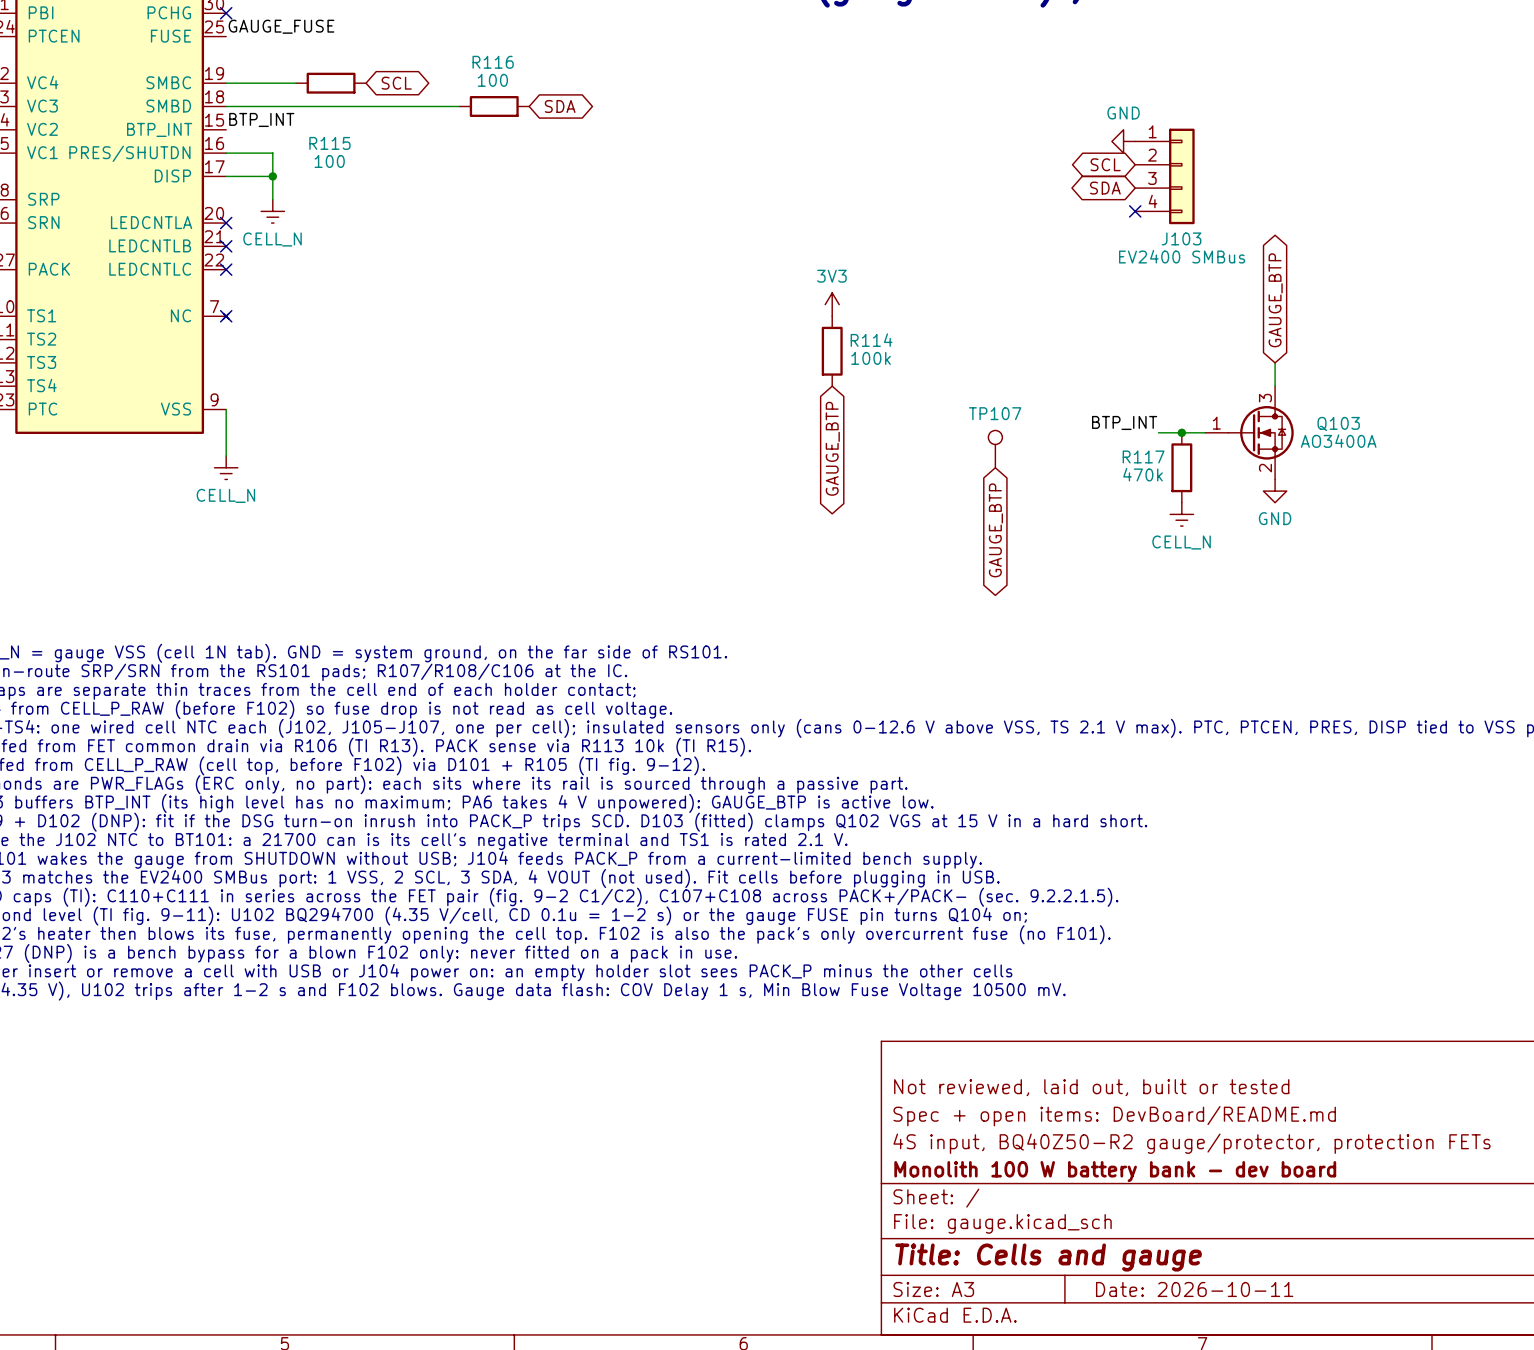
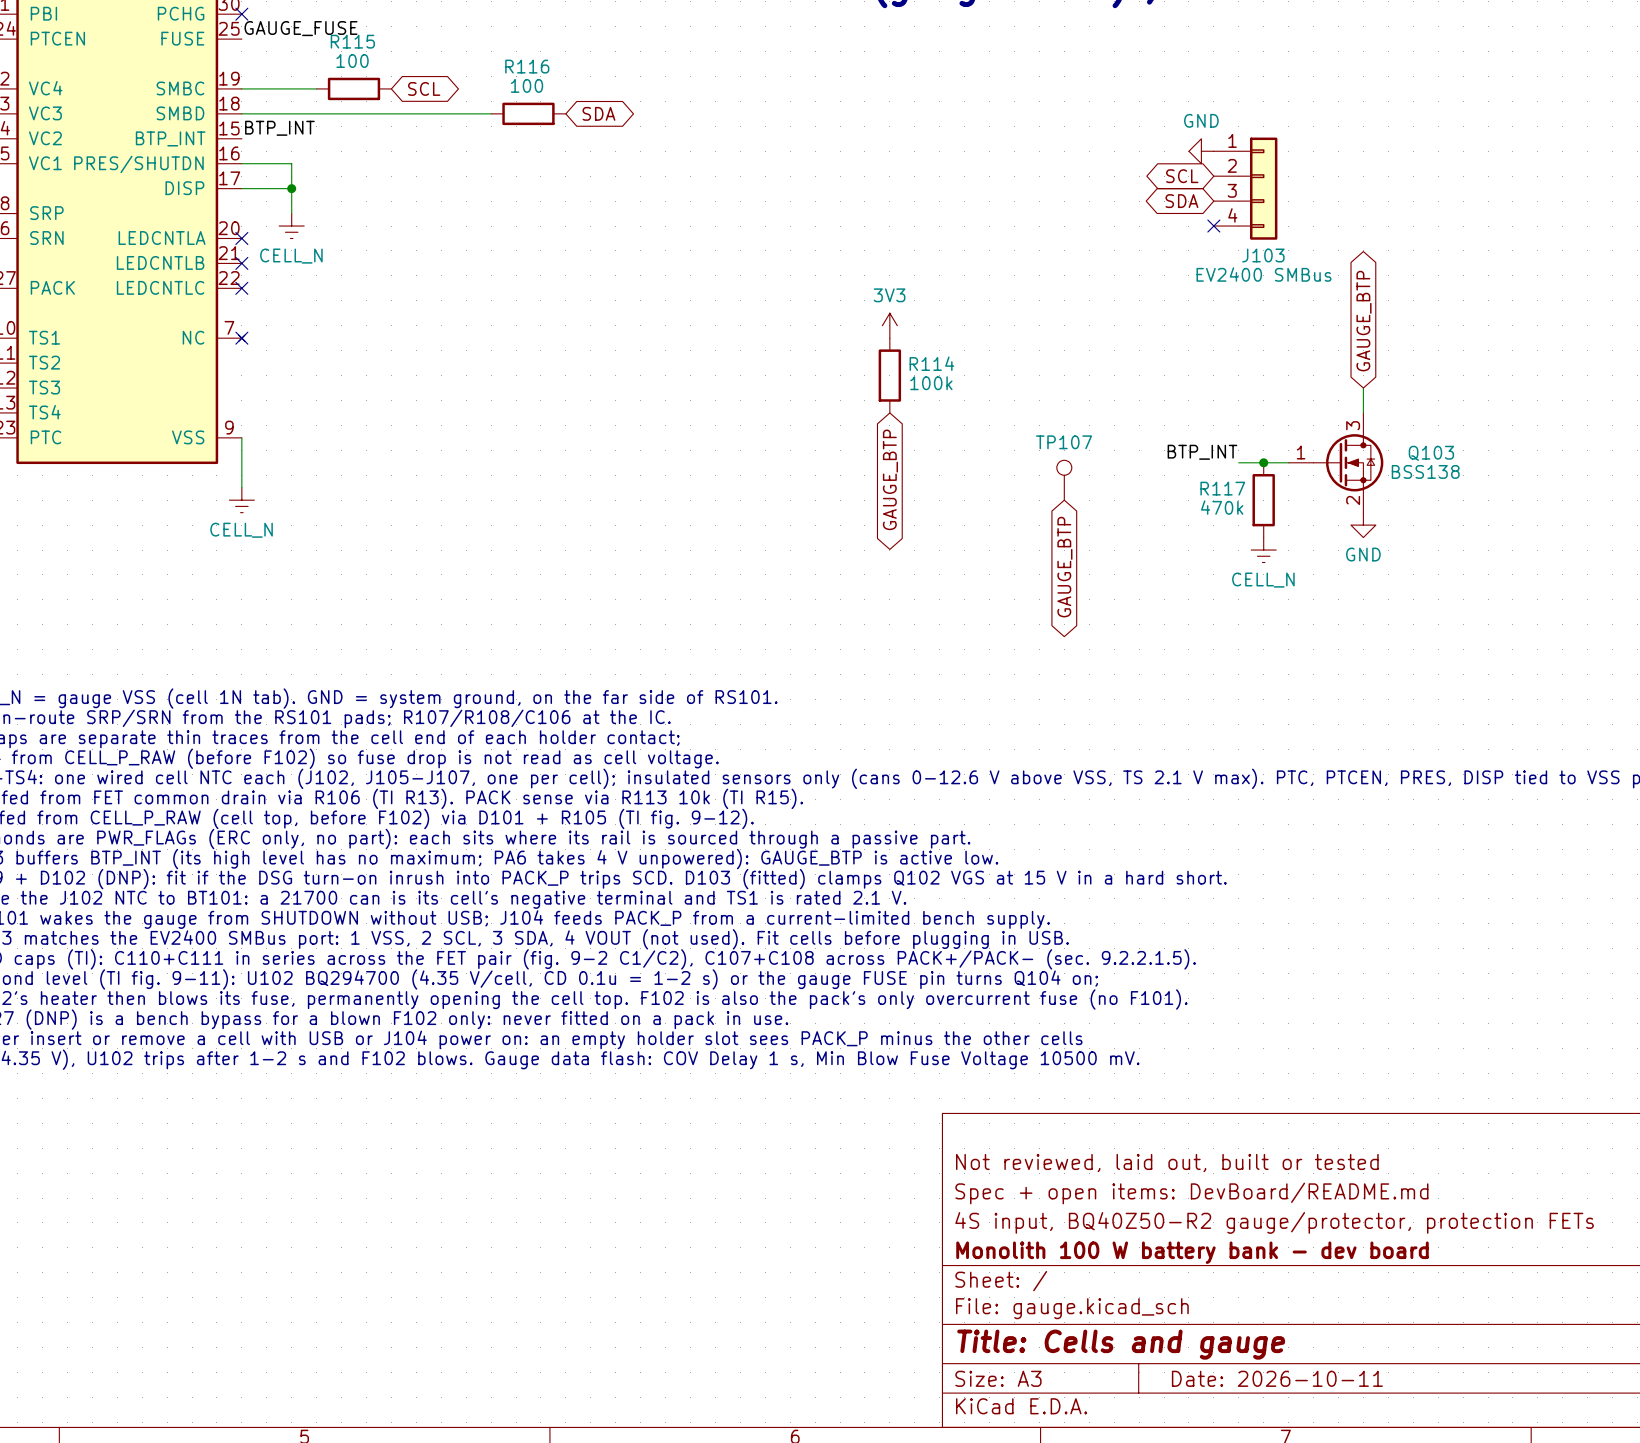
R115 name position: R115 (329, 143) -> R115 (352, 41)
R115 value position: 100 (329, 161) -> 100 (352, 61)
Q103 value: AO3400A (1338, 441) -> BSS138 (1425, 471)

